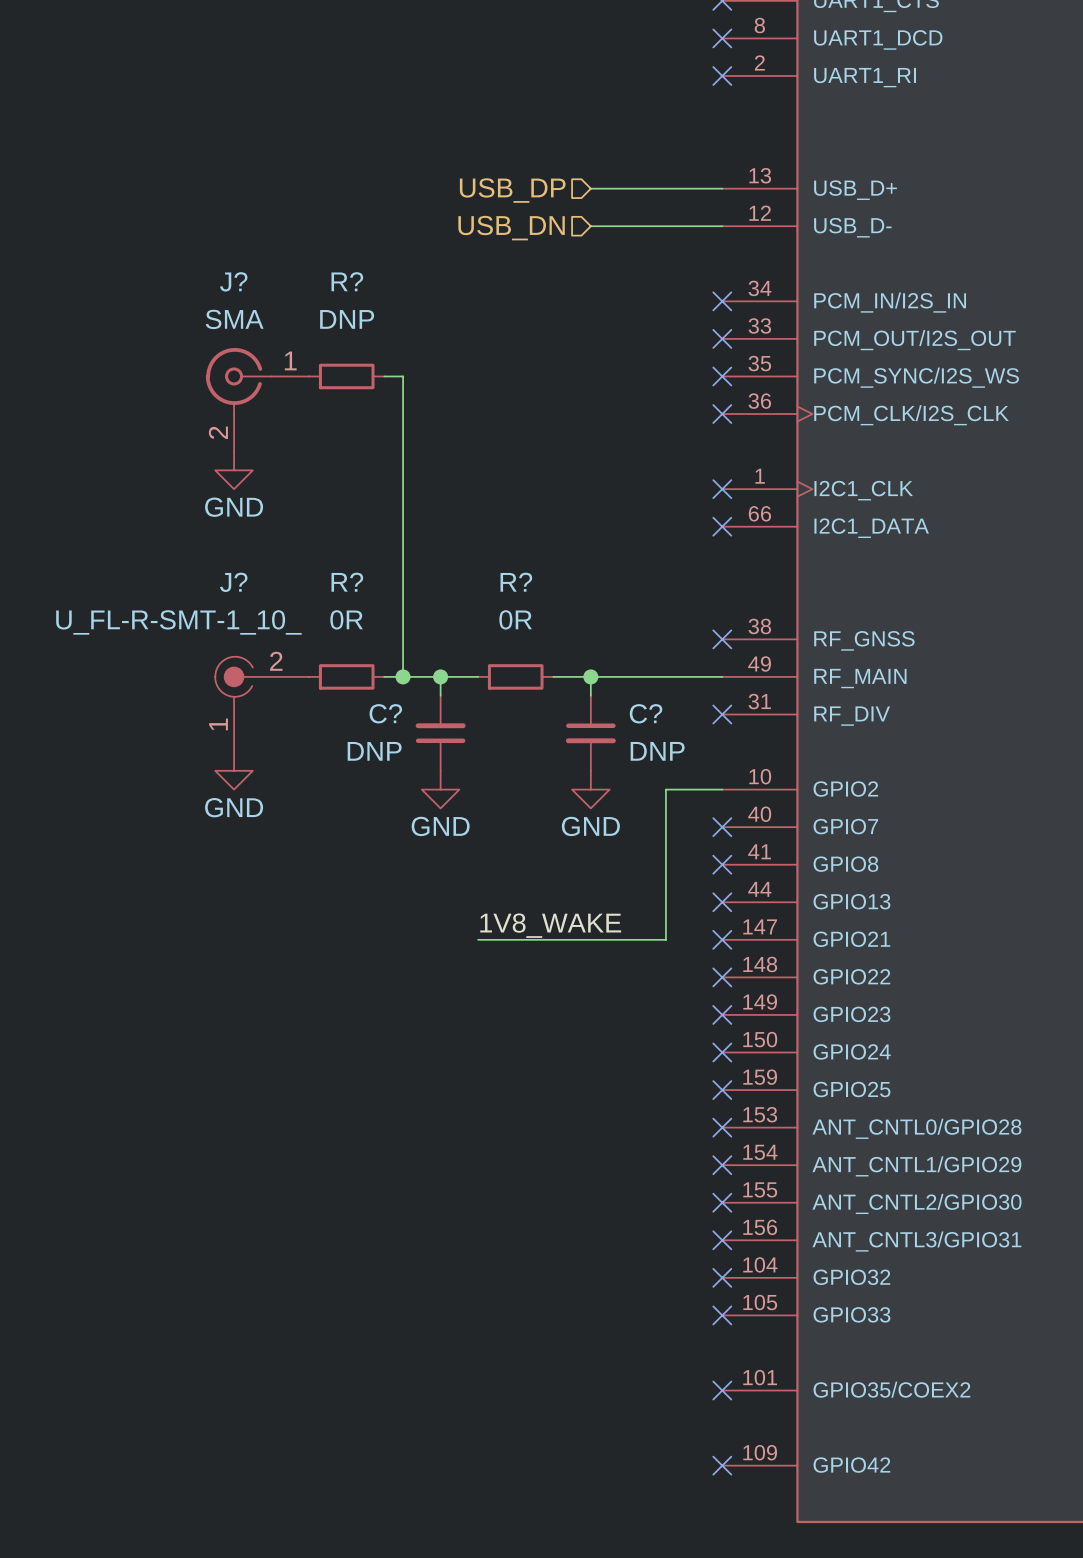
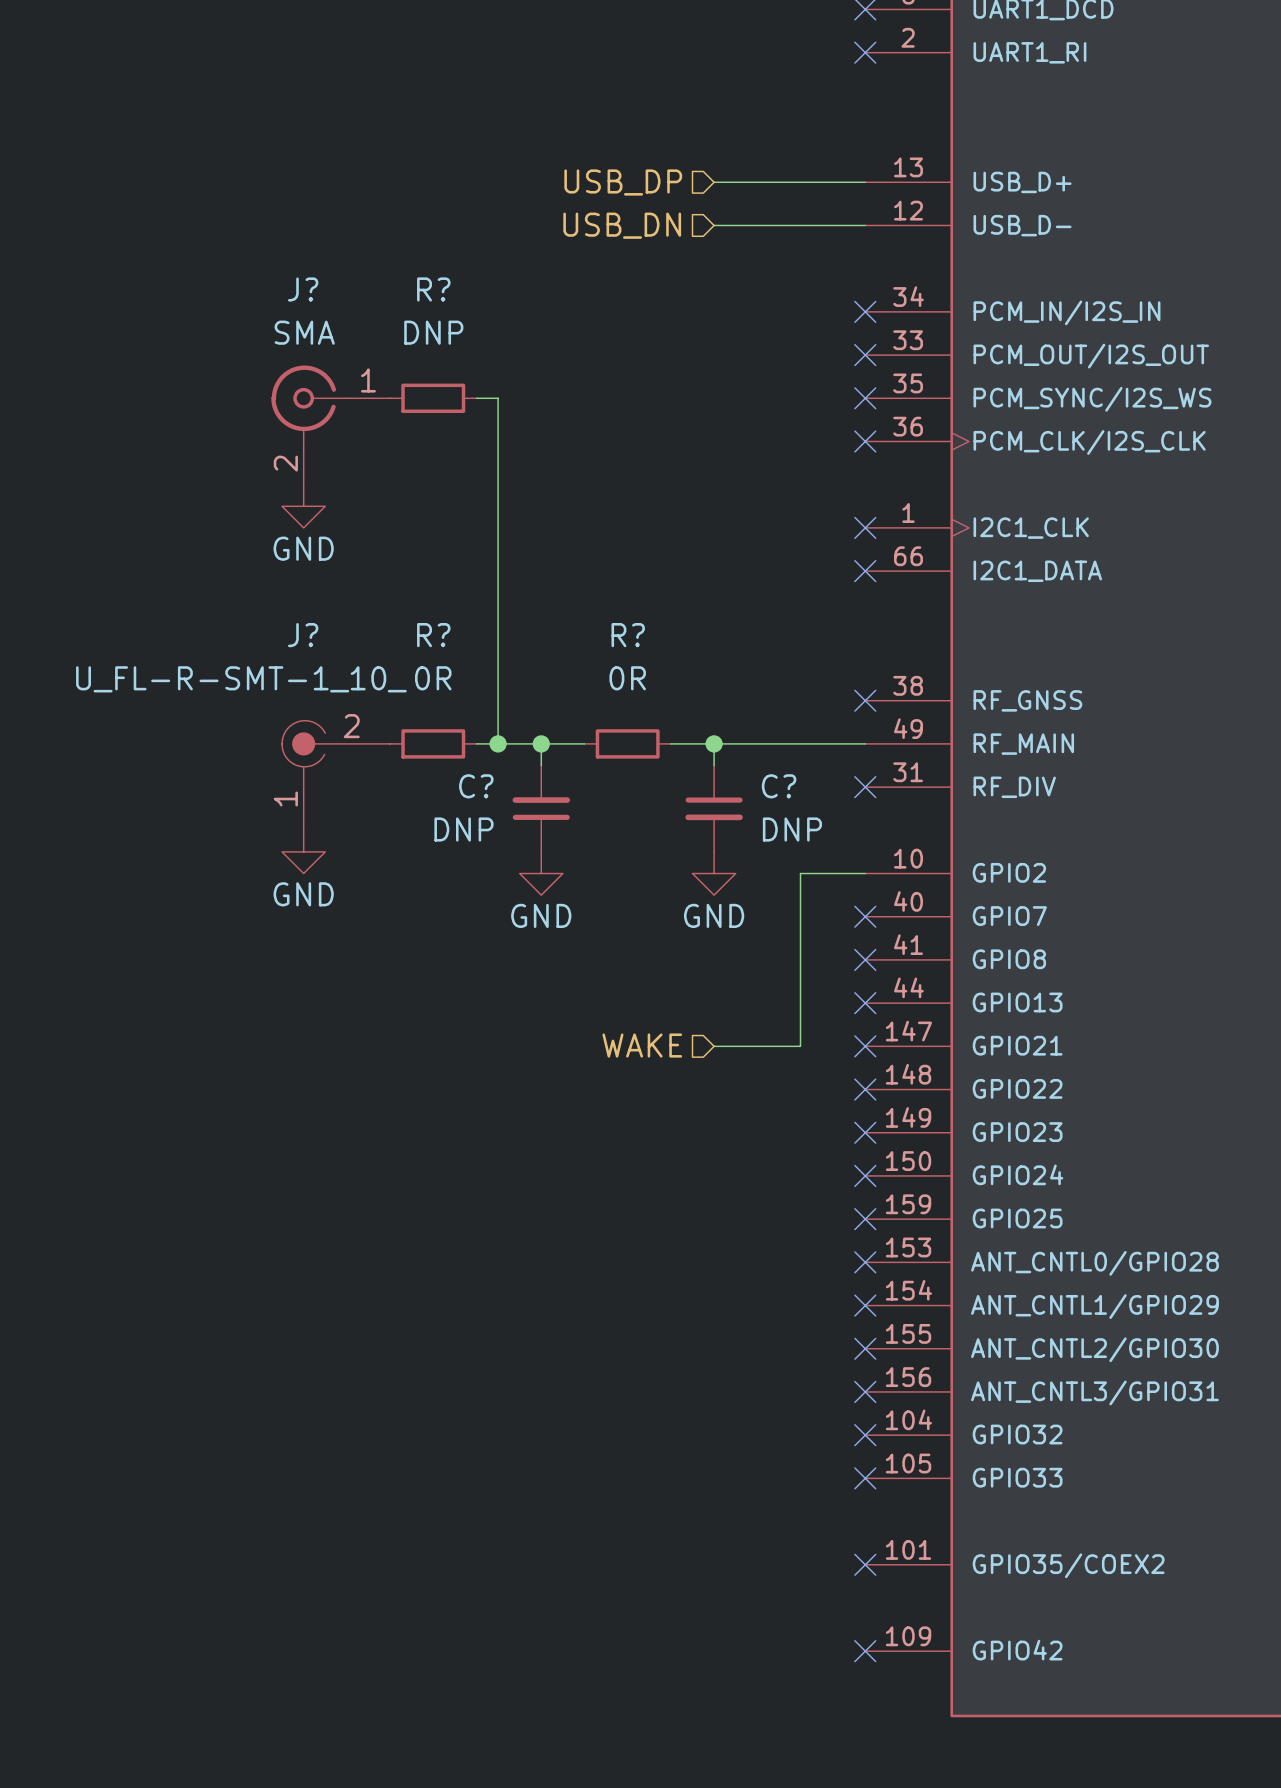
label: 1V8_WAKE (550, 925) -> none
wire: (478, 939) (590, 939) -> none
hierarchical label: none -> WAKE (642, 1045)

